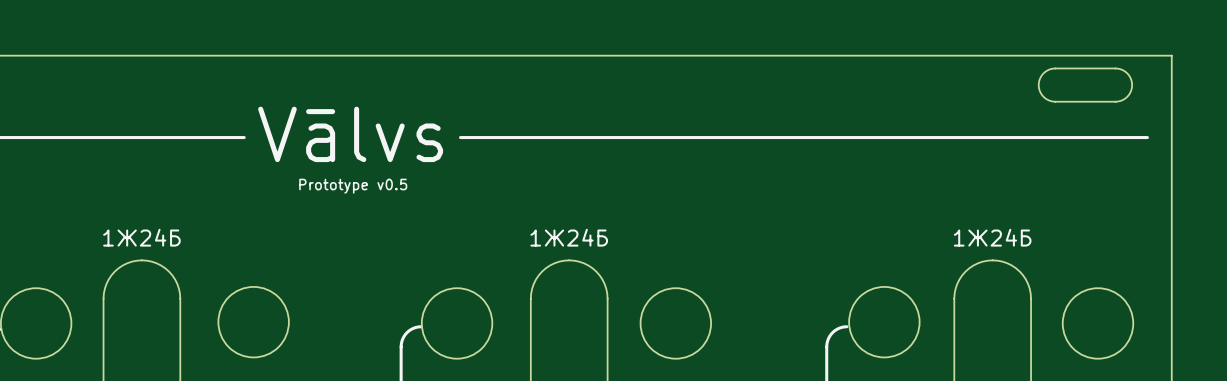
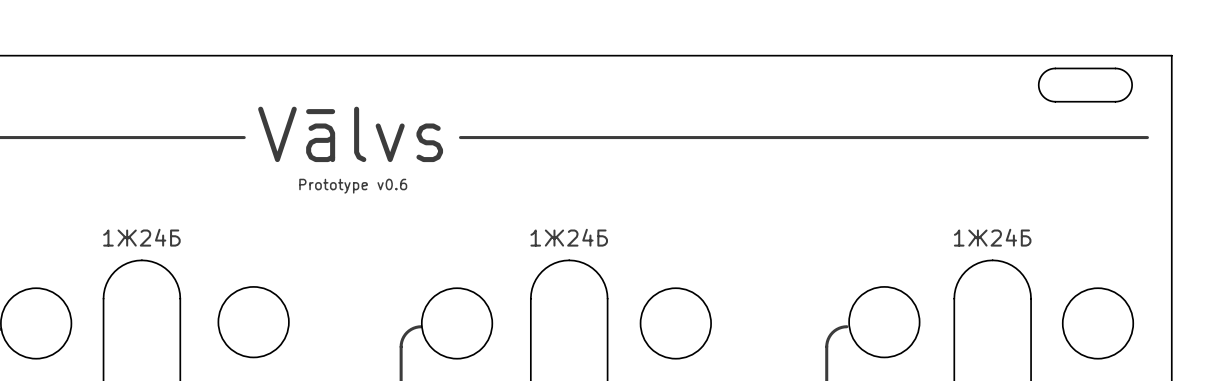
text: Prototype v0.5 (353, 186) -> Prototype v0.6 (353, 186)

